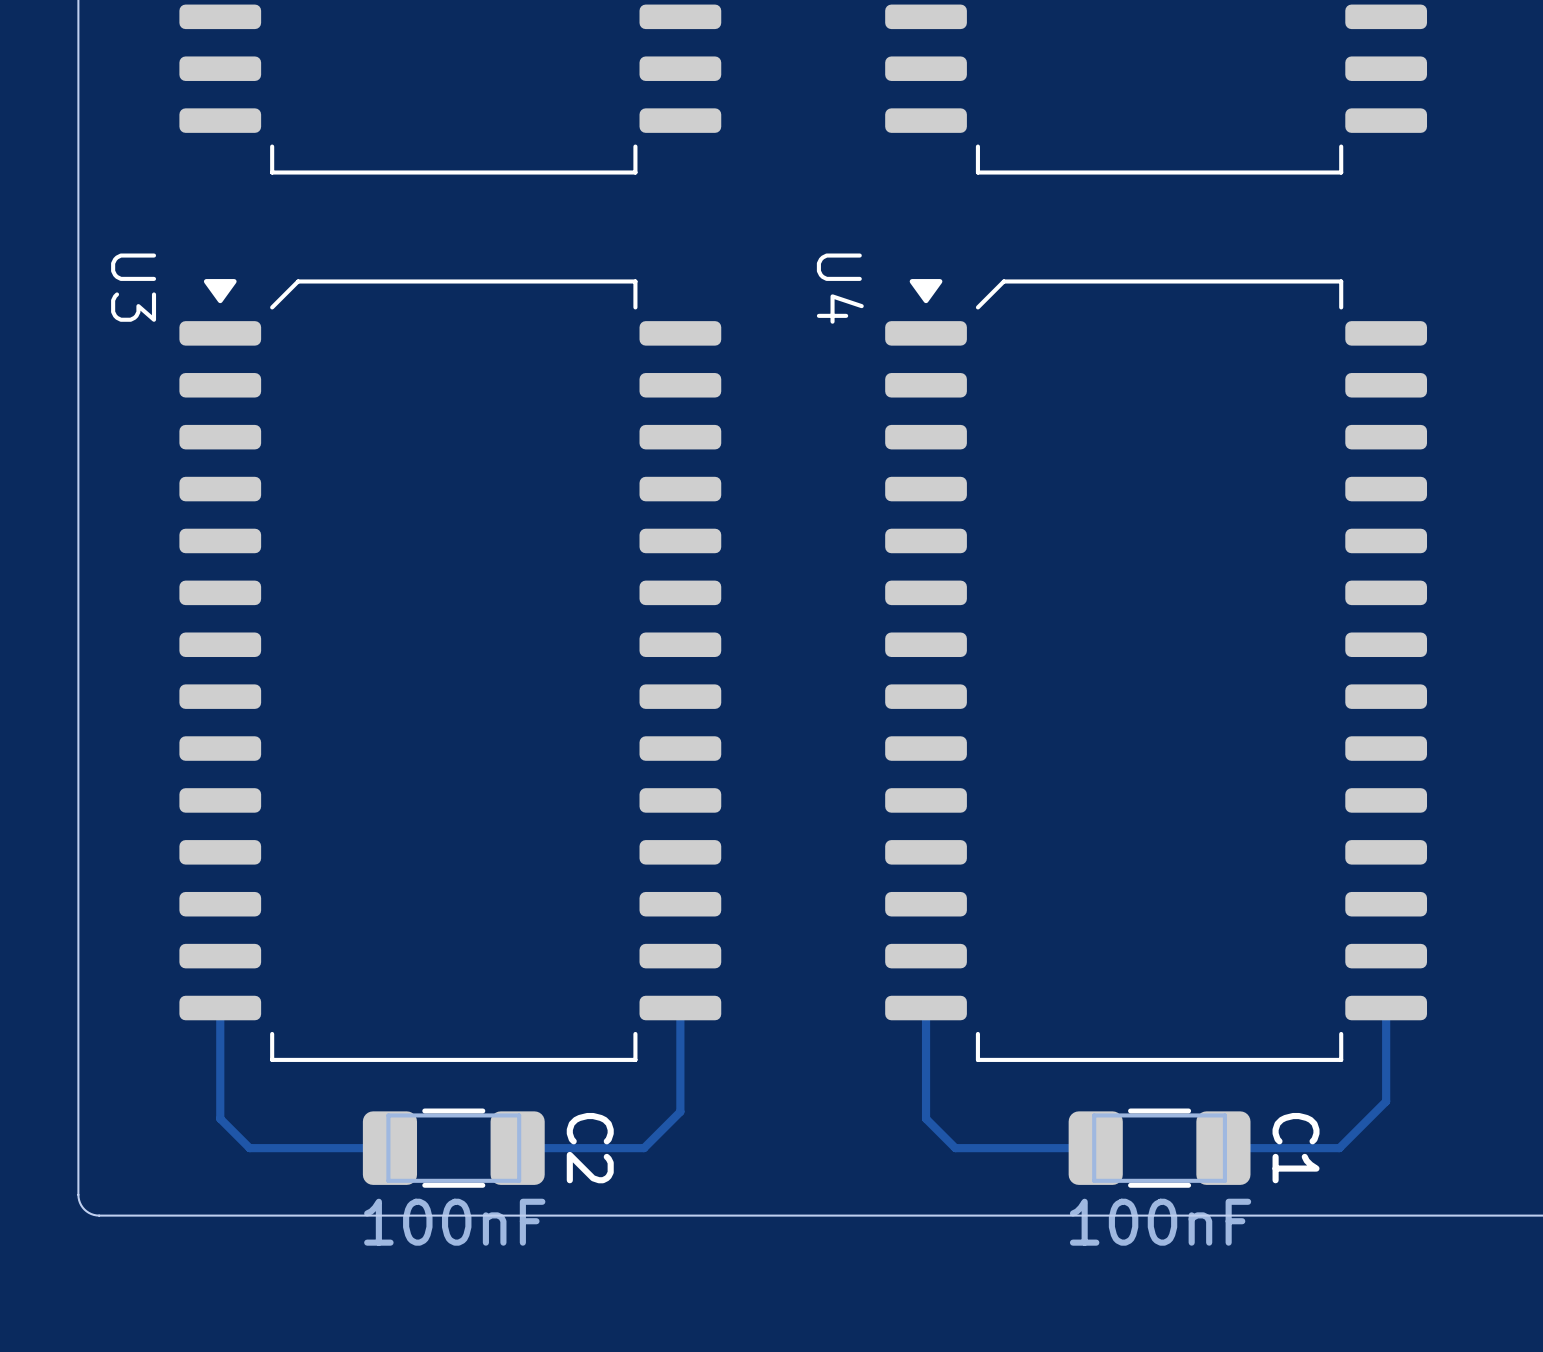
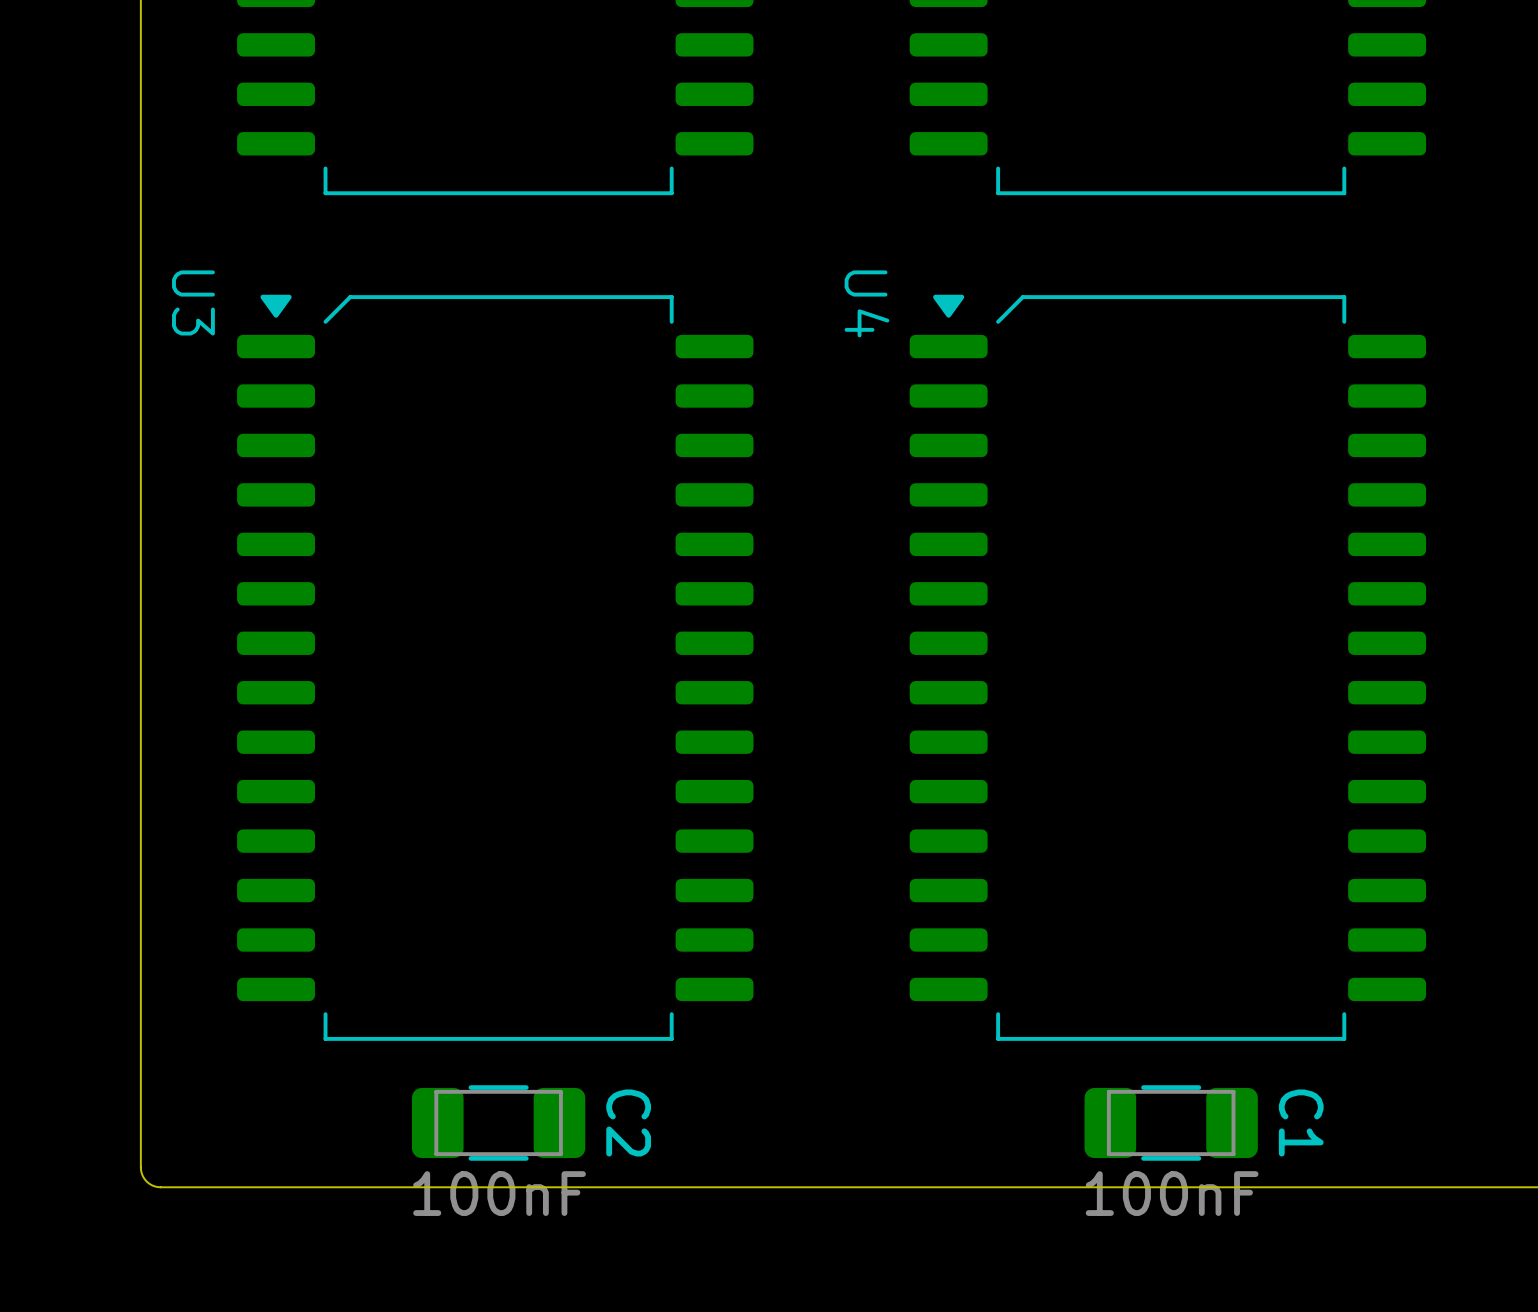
track: (220, 1008) (220, 1118) (249, 1148) (389, 1148) -> none
track: (680, 1008) (680, 1111) (644, 1148) (517, 1148) -> none
track: (926, 1008) (926, 1118) (955, 1148) (1095, 1148) -> none
track: (1386, 1008) (1386, 1101) (1339, 1148) (1223, 1148) -> none

